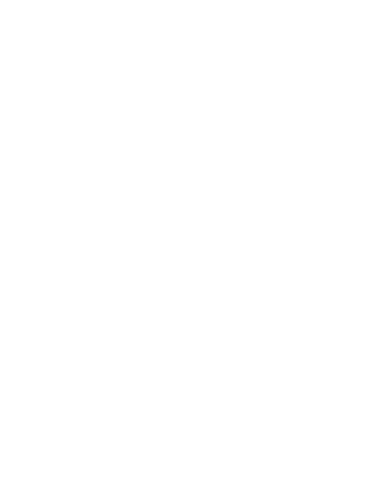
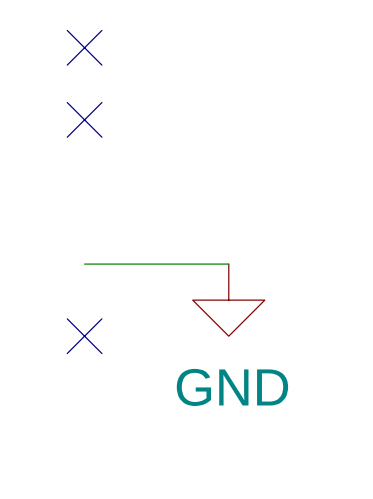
no-connect mark: none -> (84, 47)
no-connect mark: none -> (84, 119)
wire: none -> (84, 264) (228, 264)
power symbol: none -> GND (228, 300)
no-connect mark: none -> (84, 336)

